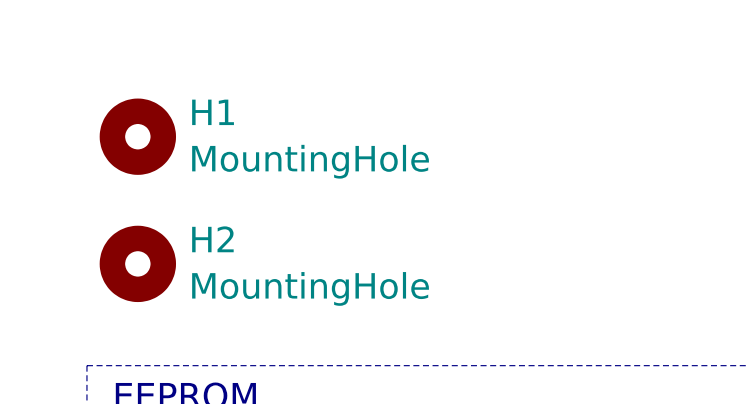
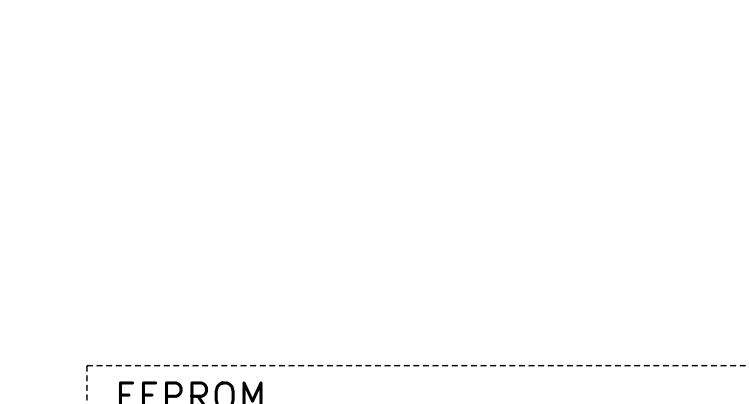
H1: MountingHole (137, 136) -> none
H2: MountingHole (137, 263) -> none

